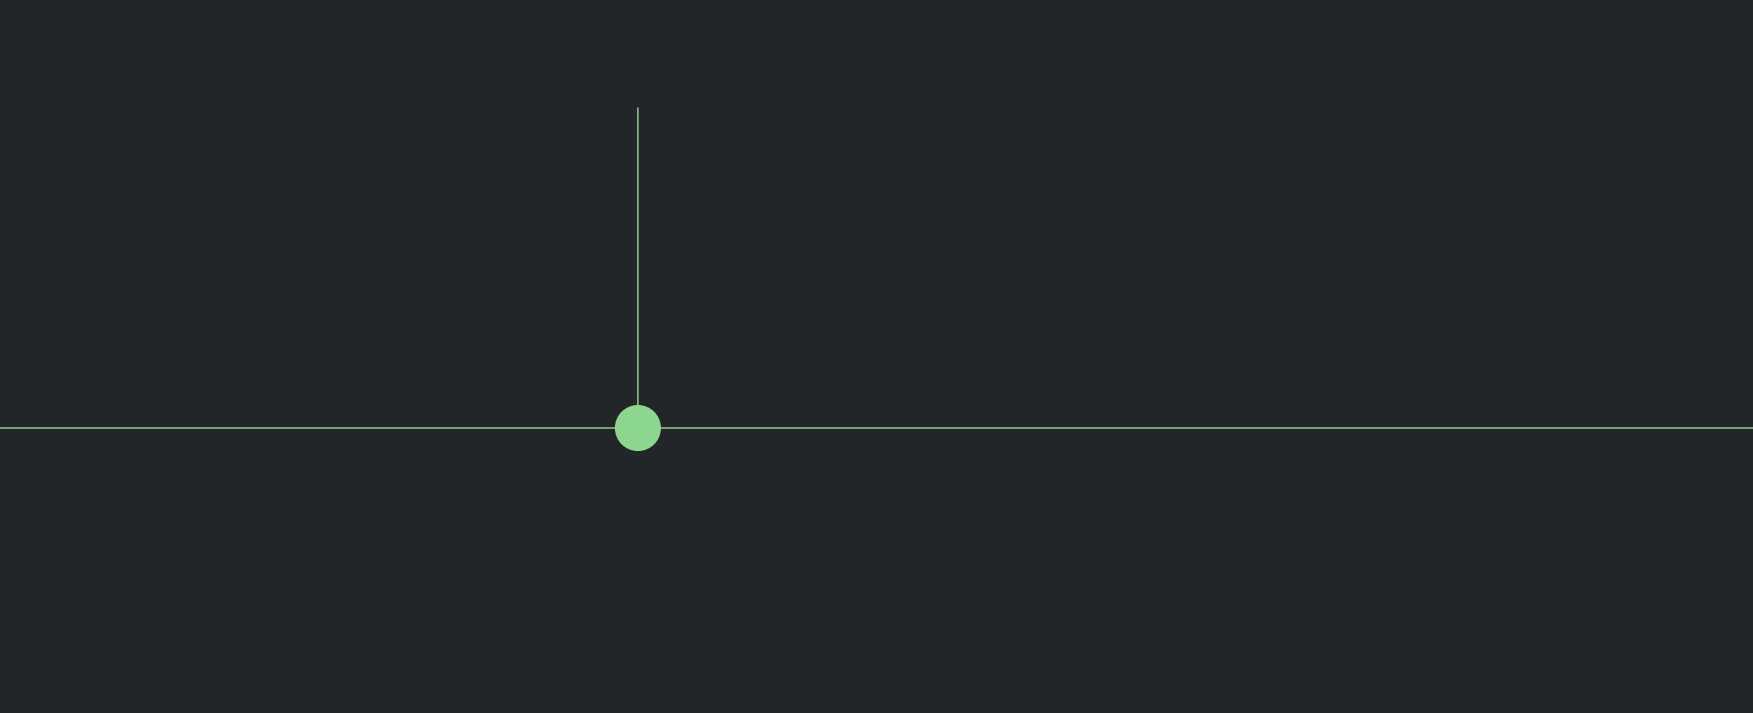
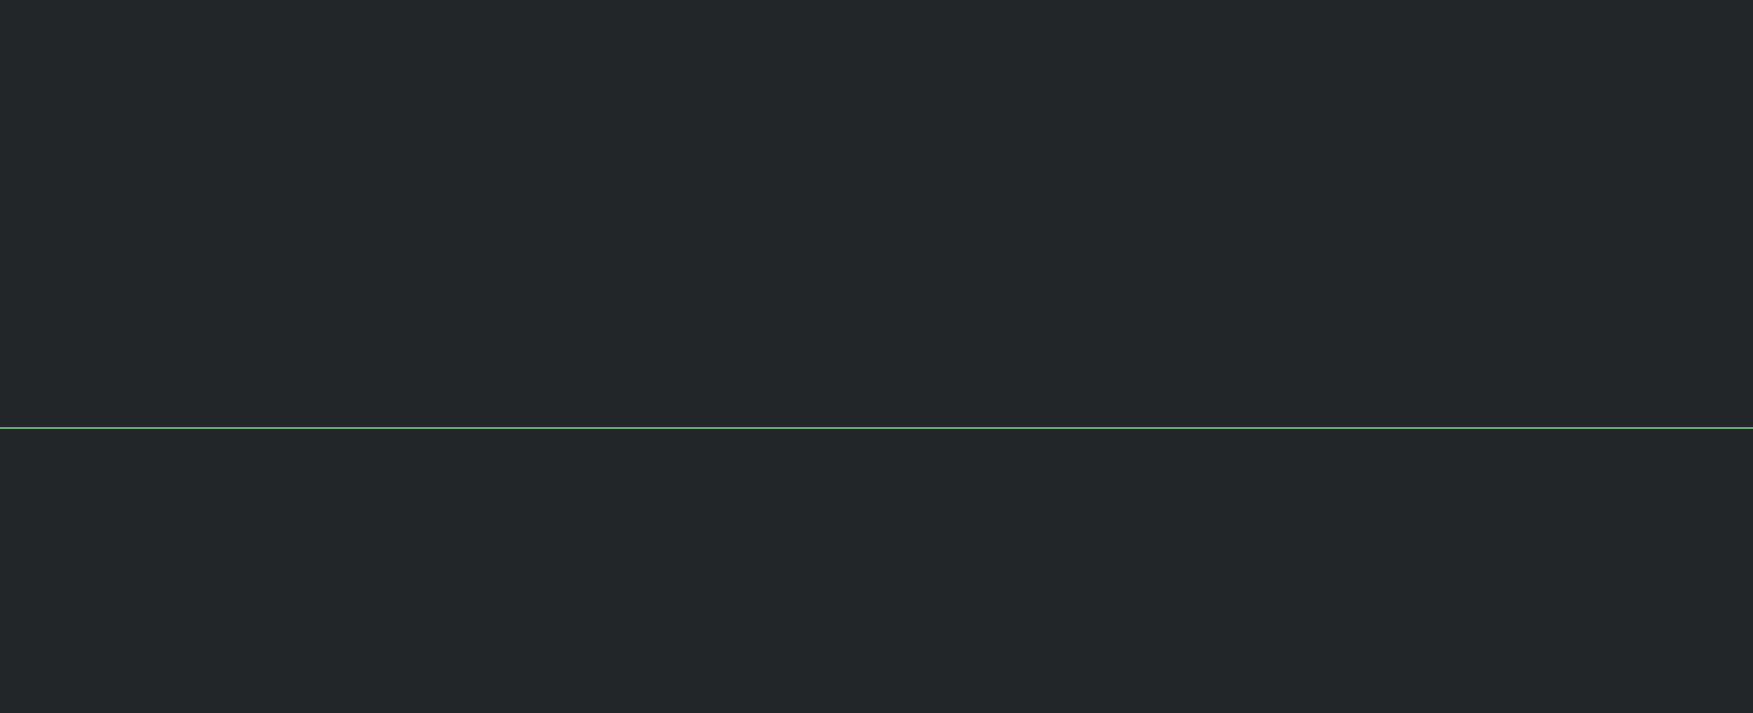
wire: (637, 107) (637, 428) -> none
junction: (637, 428) -> none

